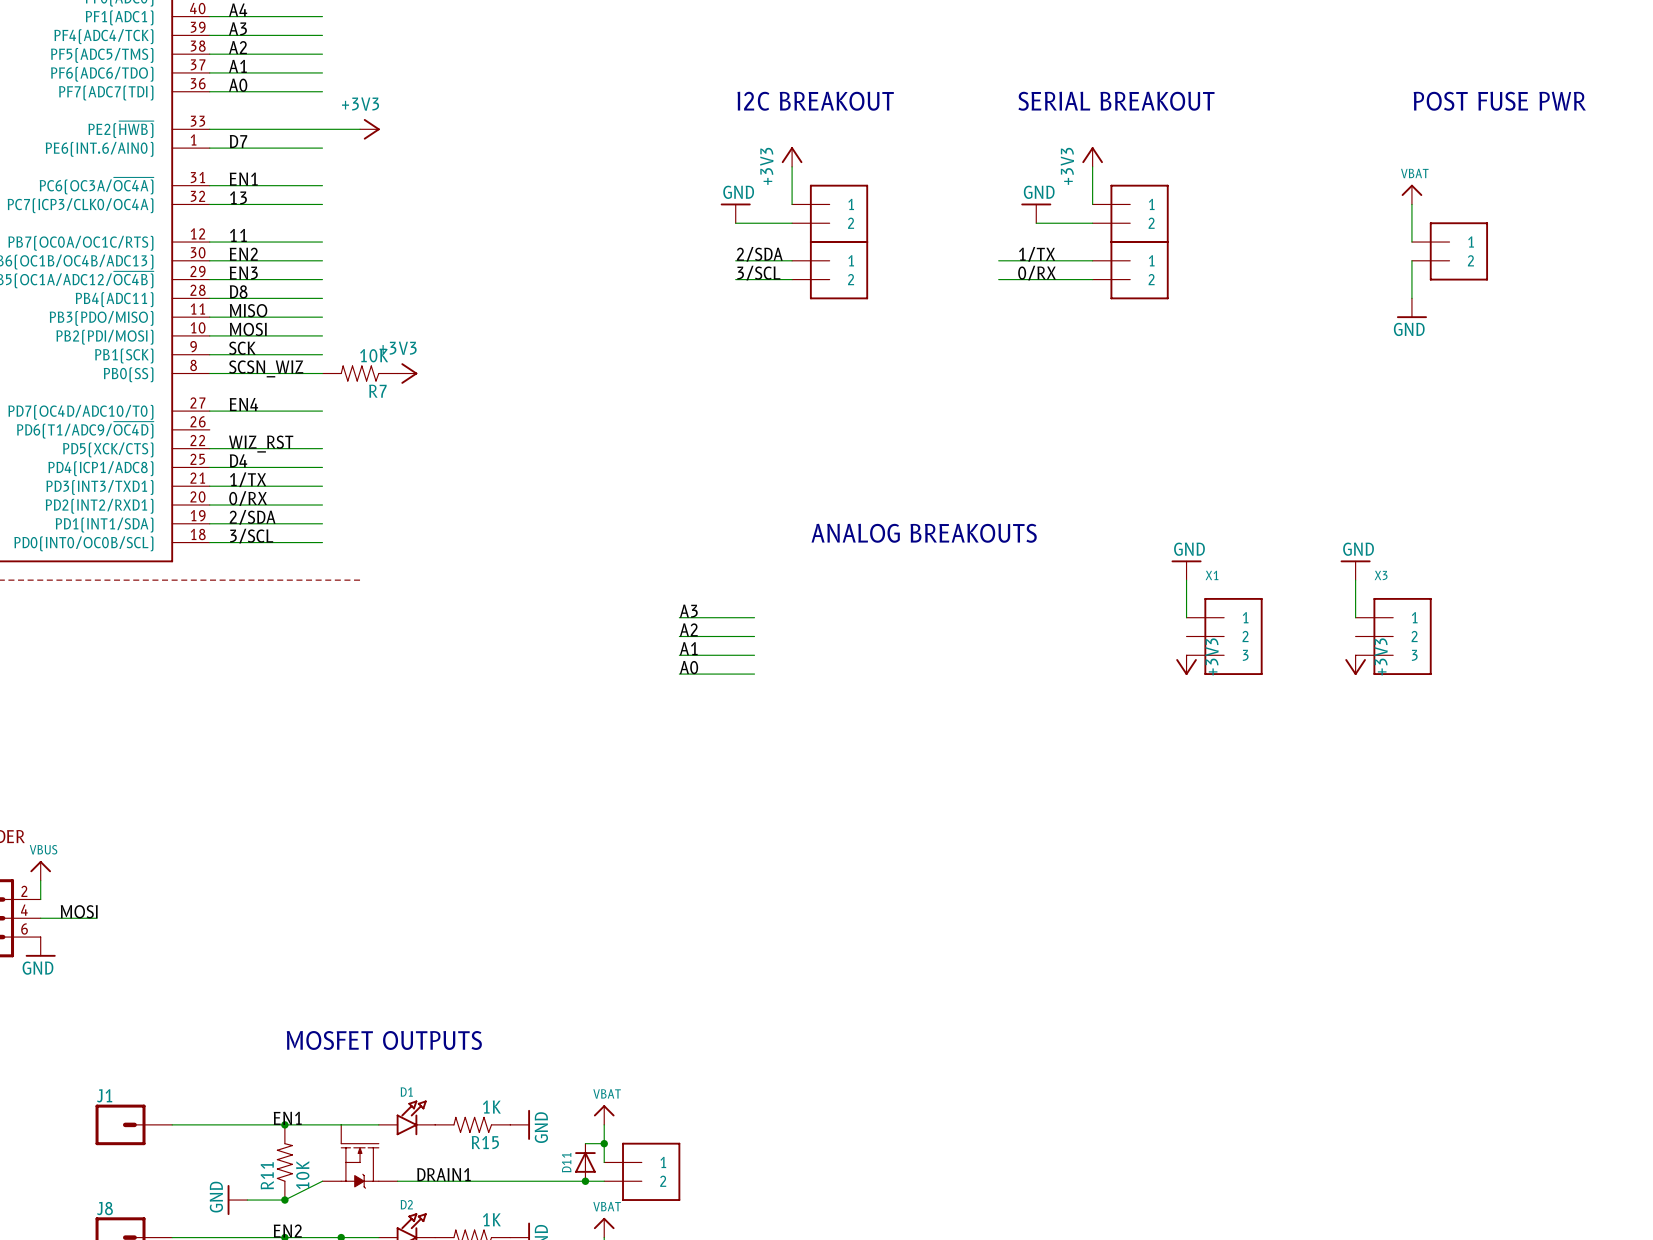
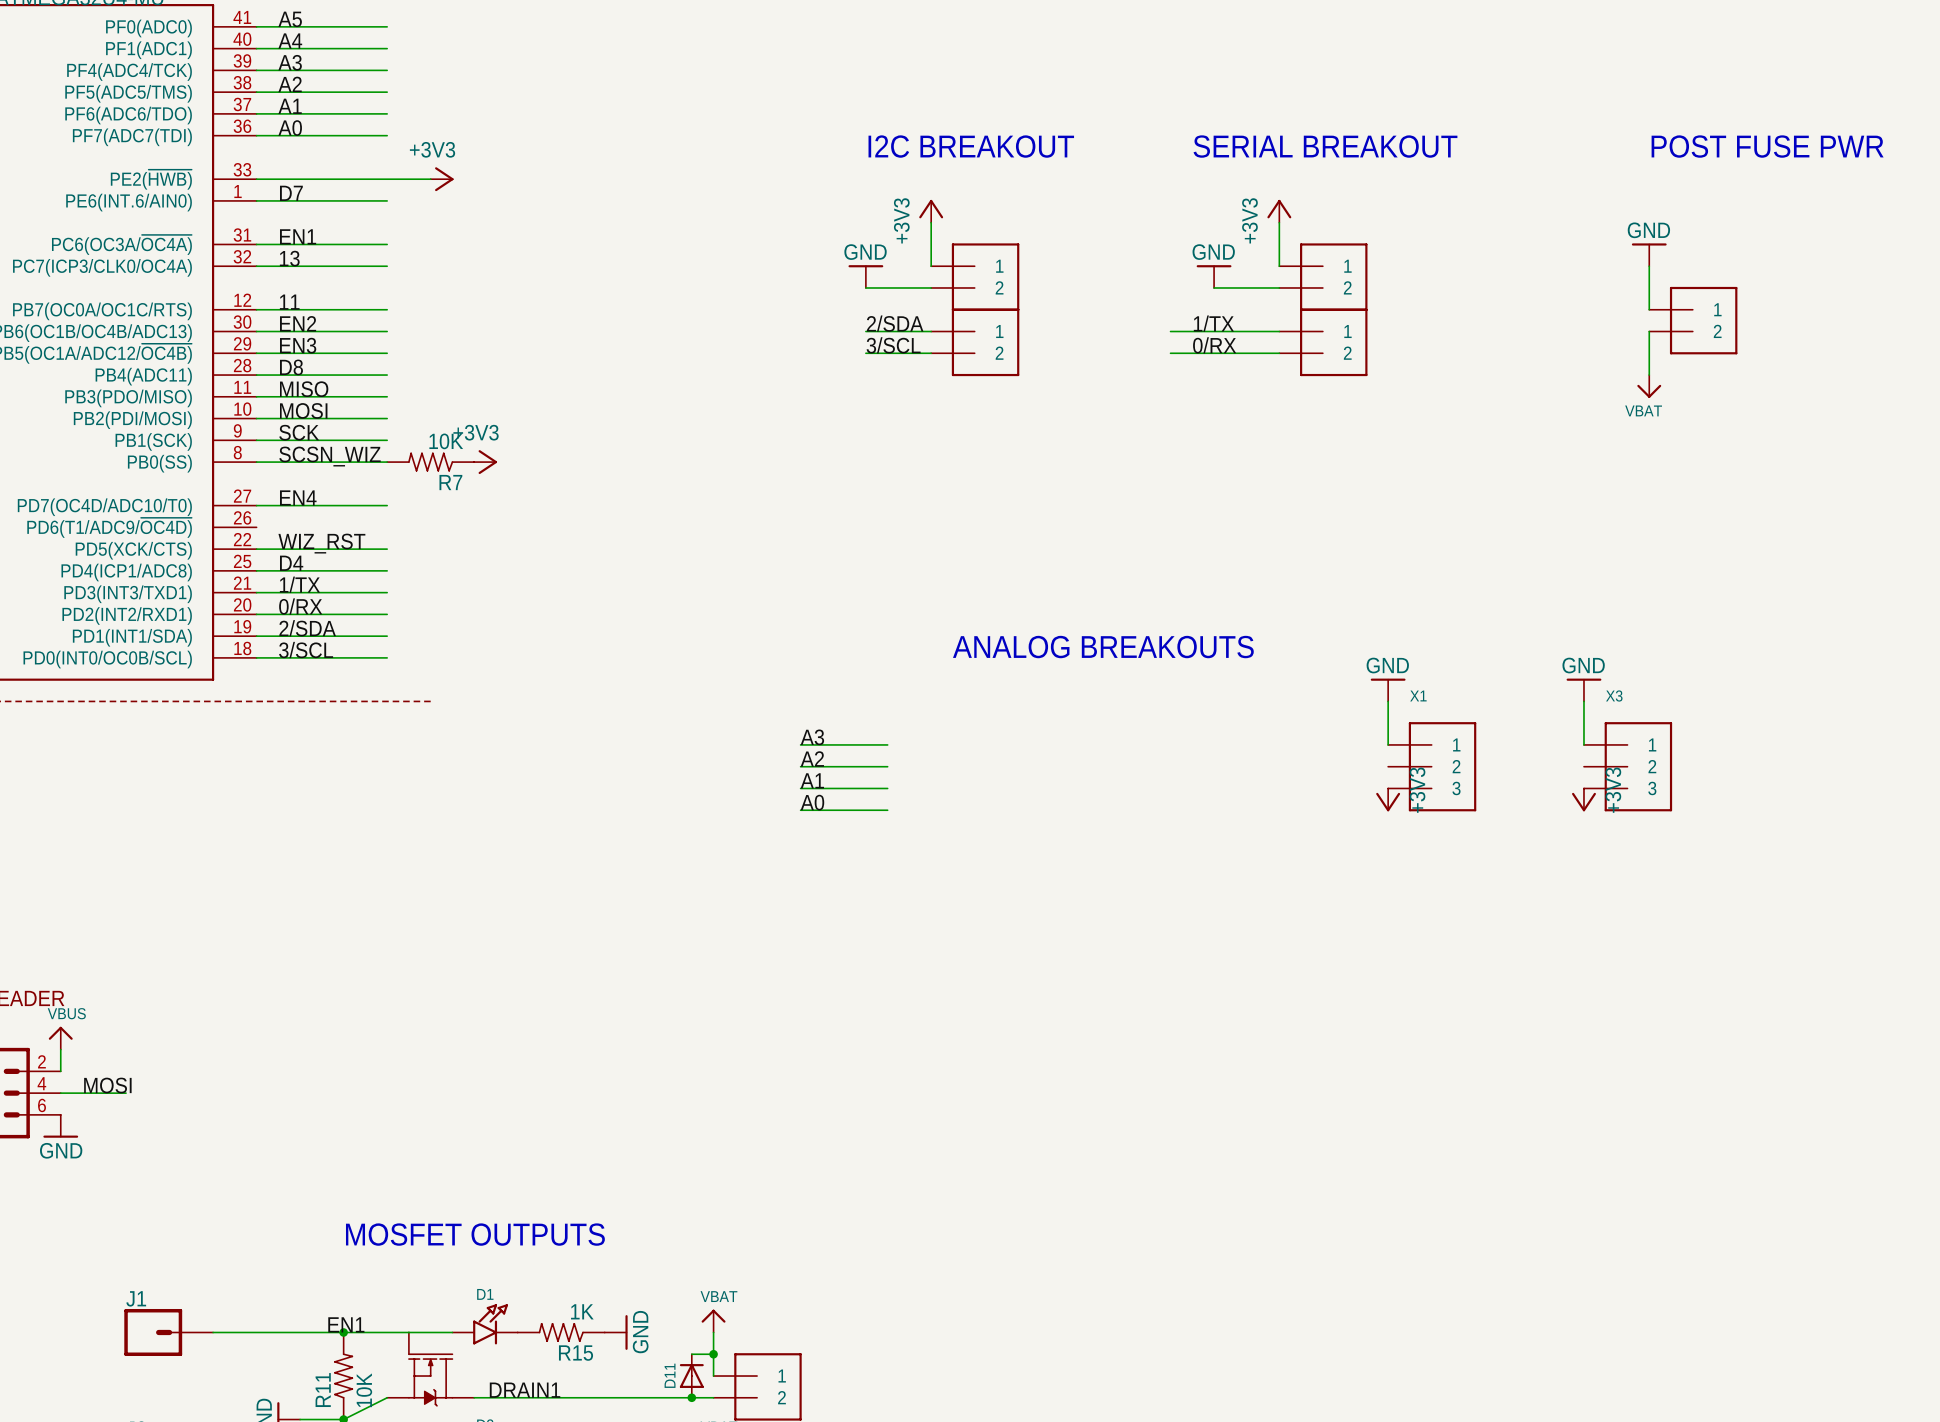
power symbol: VBAT (1411, 194) -> GND (1649, 254)
power symbol: GND (1411, 308) -> VBAT (1649, 386)

